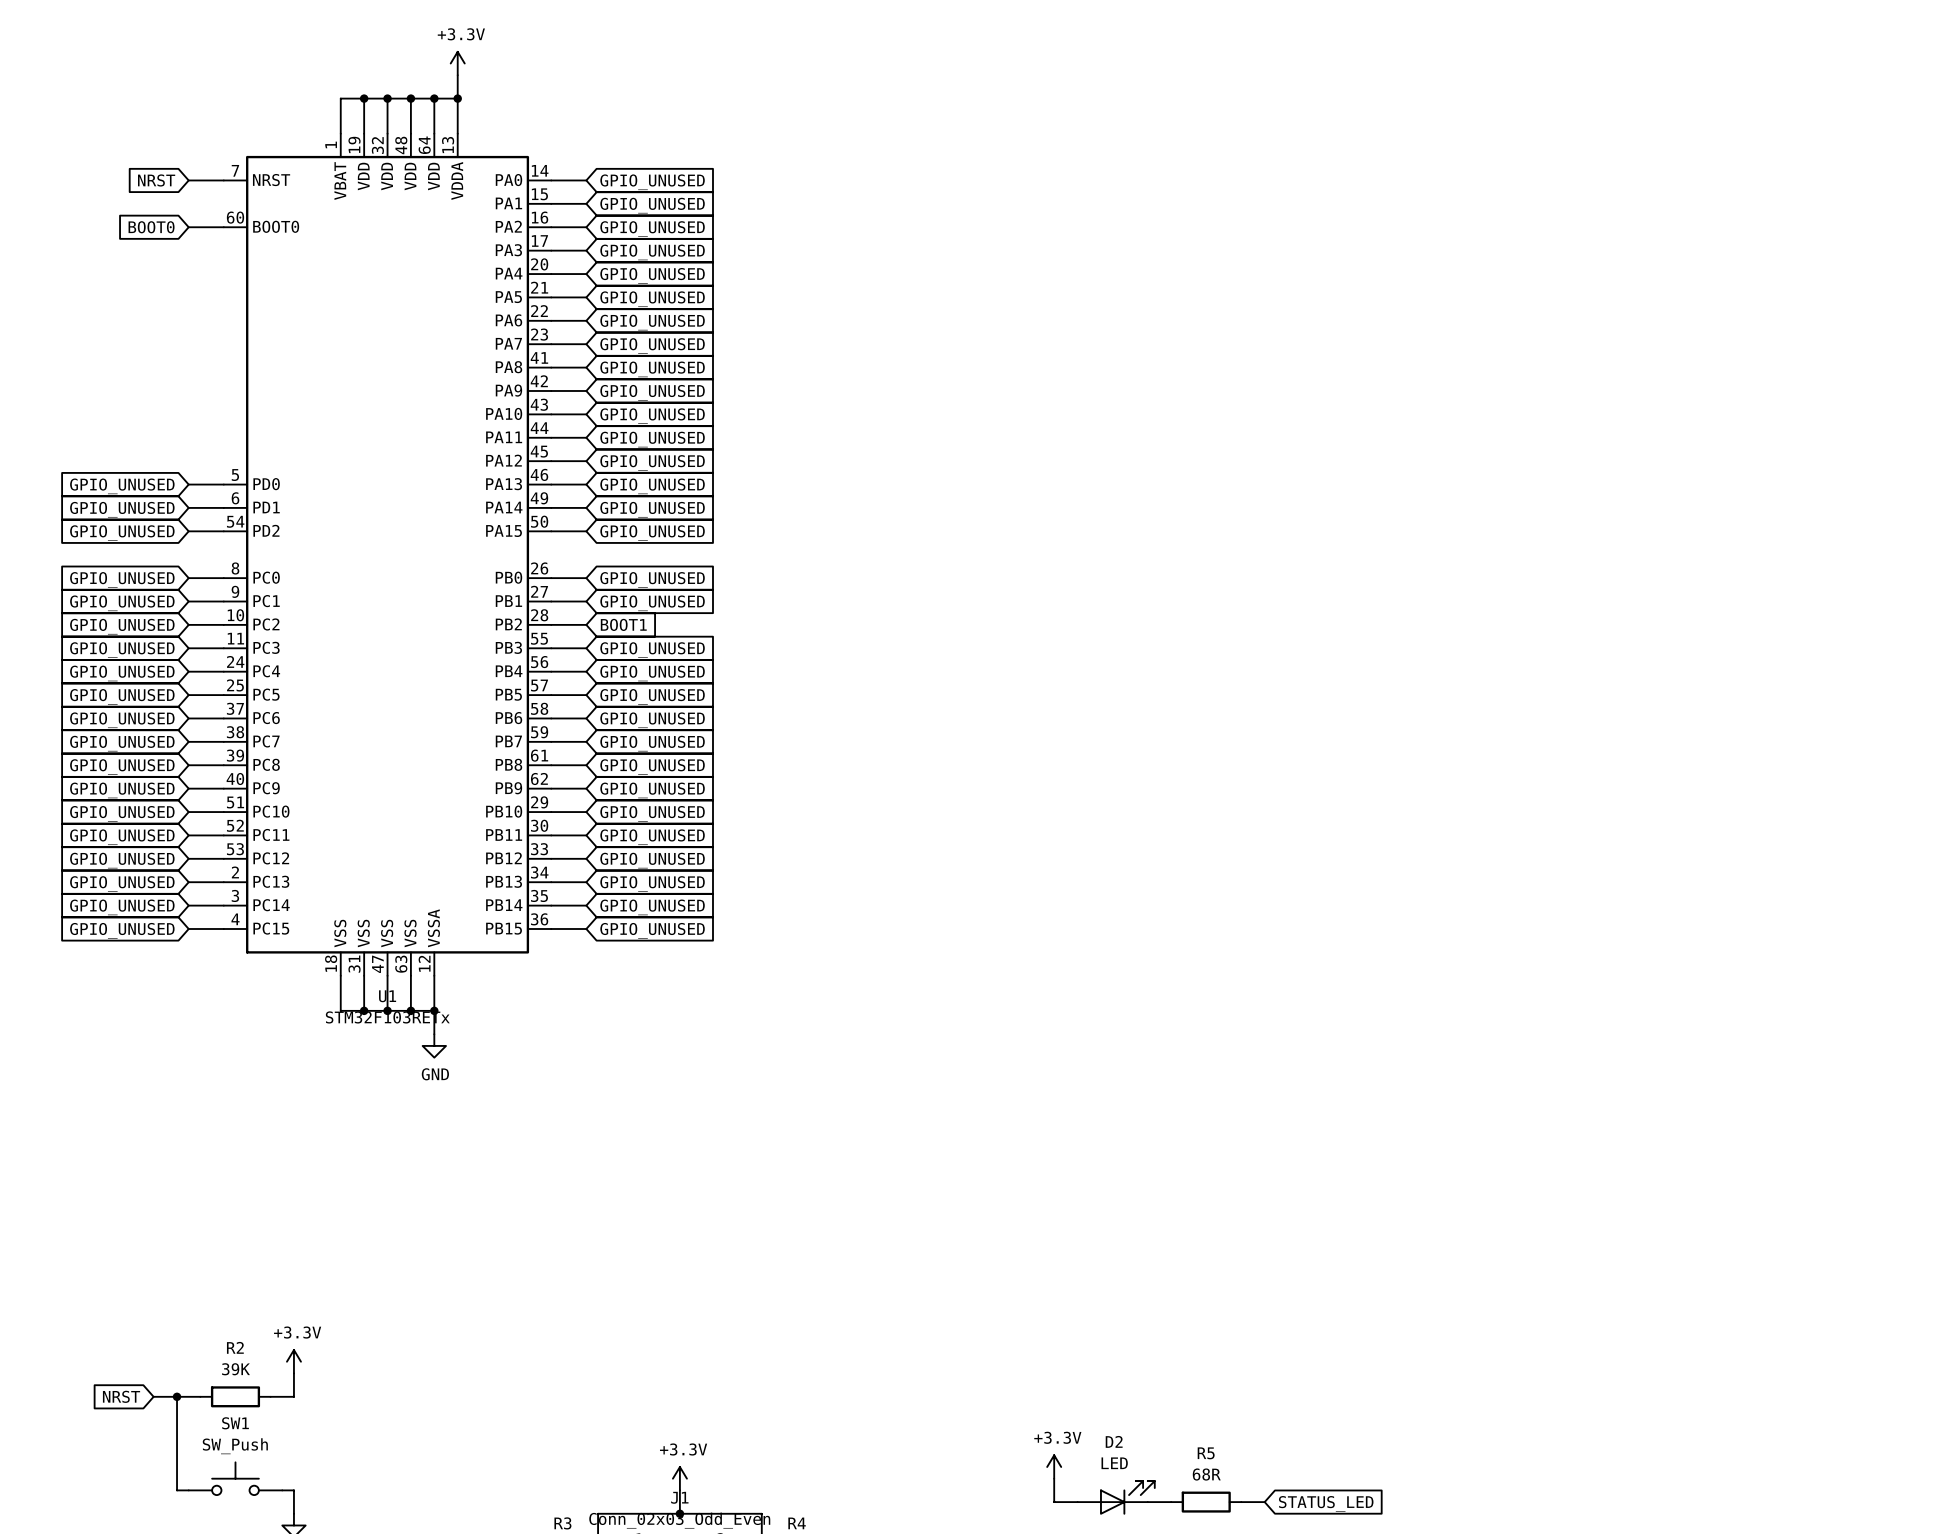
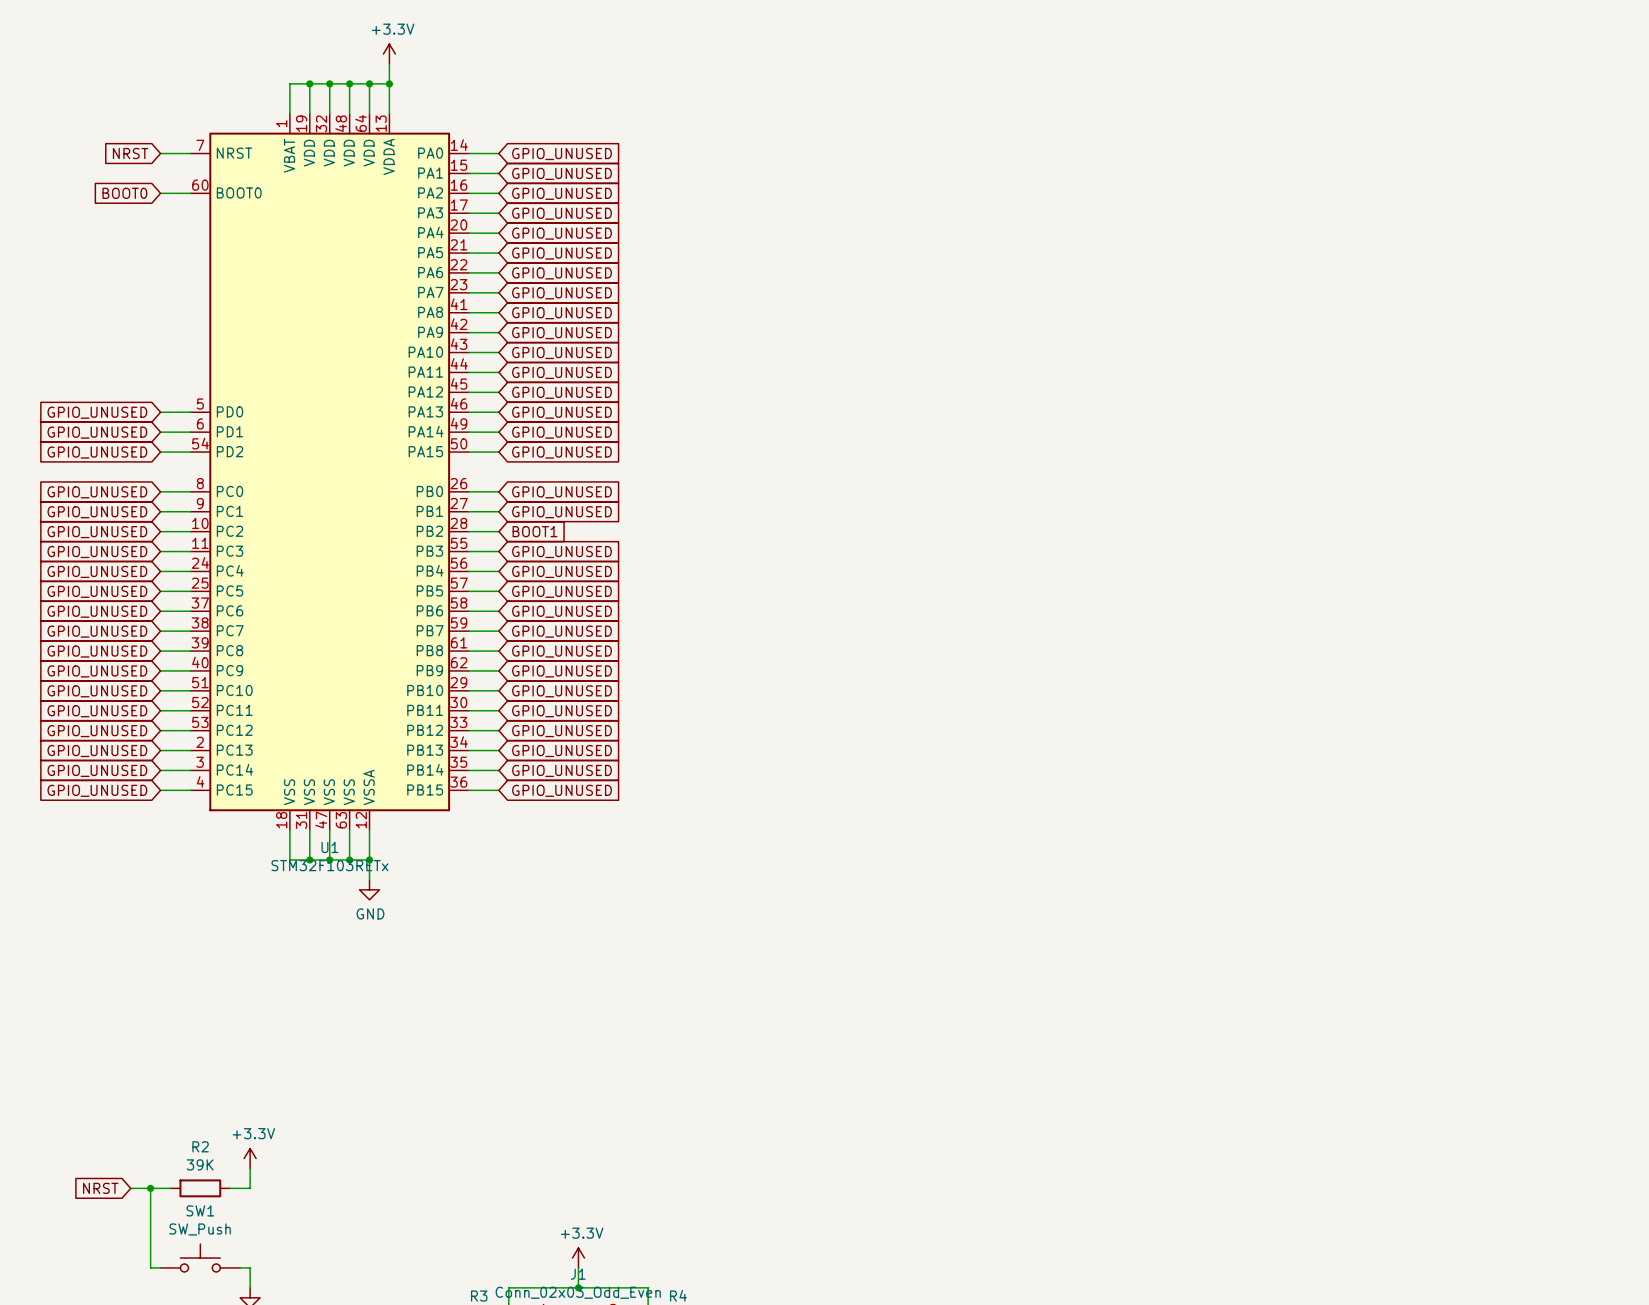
power symbol: +3.3V (1054, 1467) -> none
wire: (1054, 1478) (1054, 1502) (1077, 1502) -> none
D2: LED (1116, 1497) -> none
wire: (1147, 1502) (1171, 1502) -> none
R5: 68R (1206, 1502) -> none
wire: (1241, 1502) (1264, 1502) -> none
global label: STATUS_LED (1326, 1503) -> none

